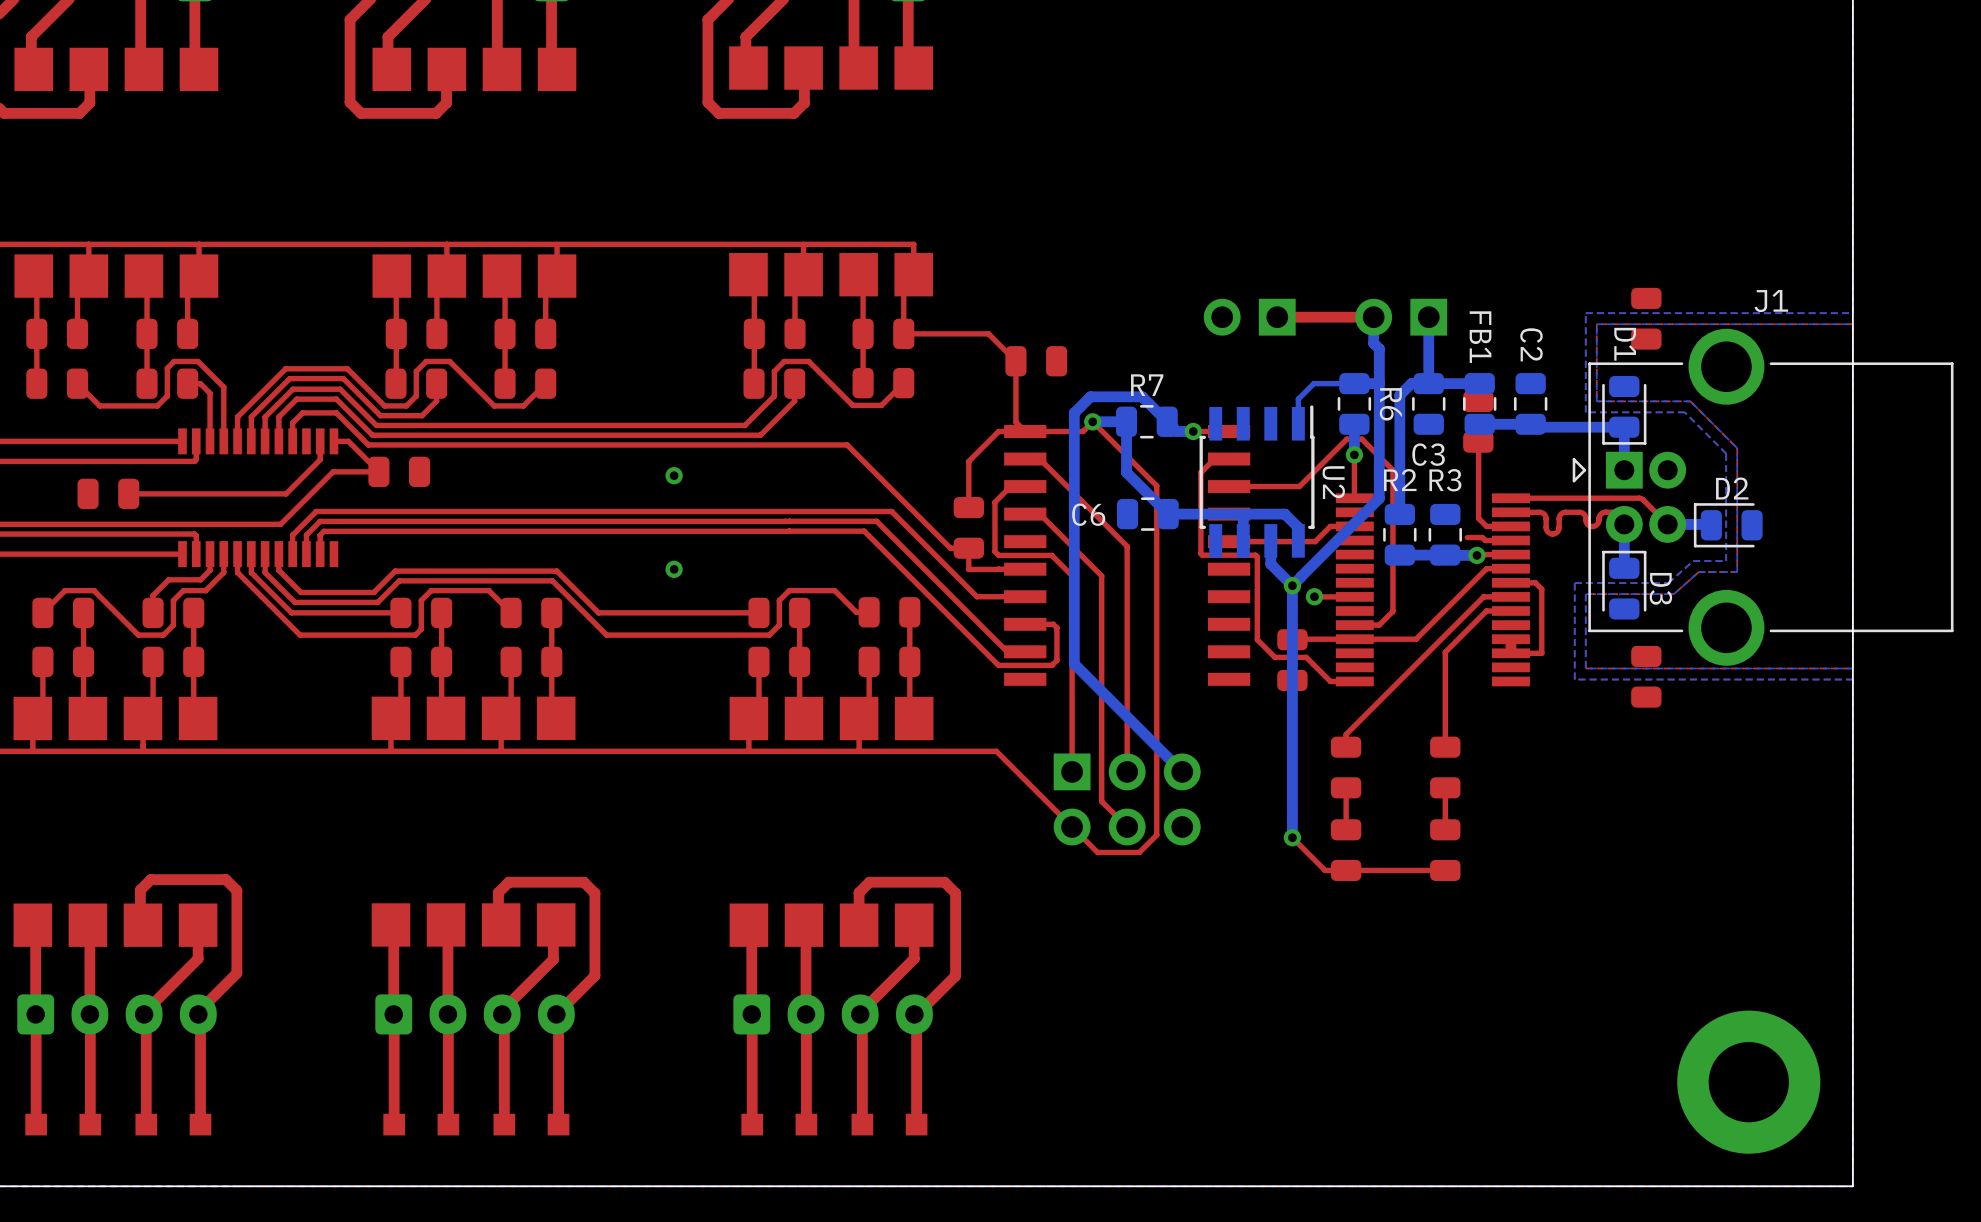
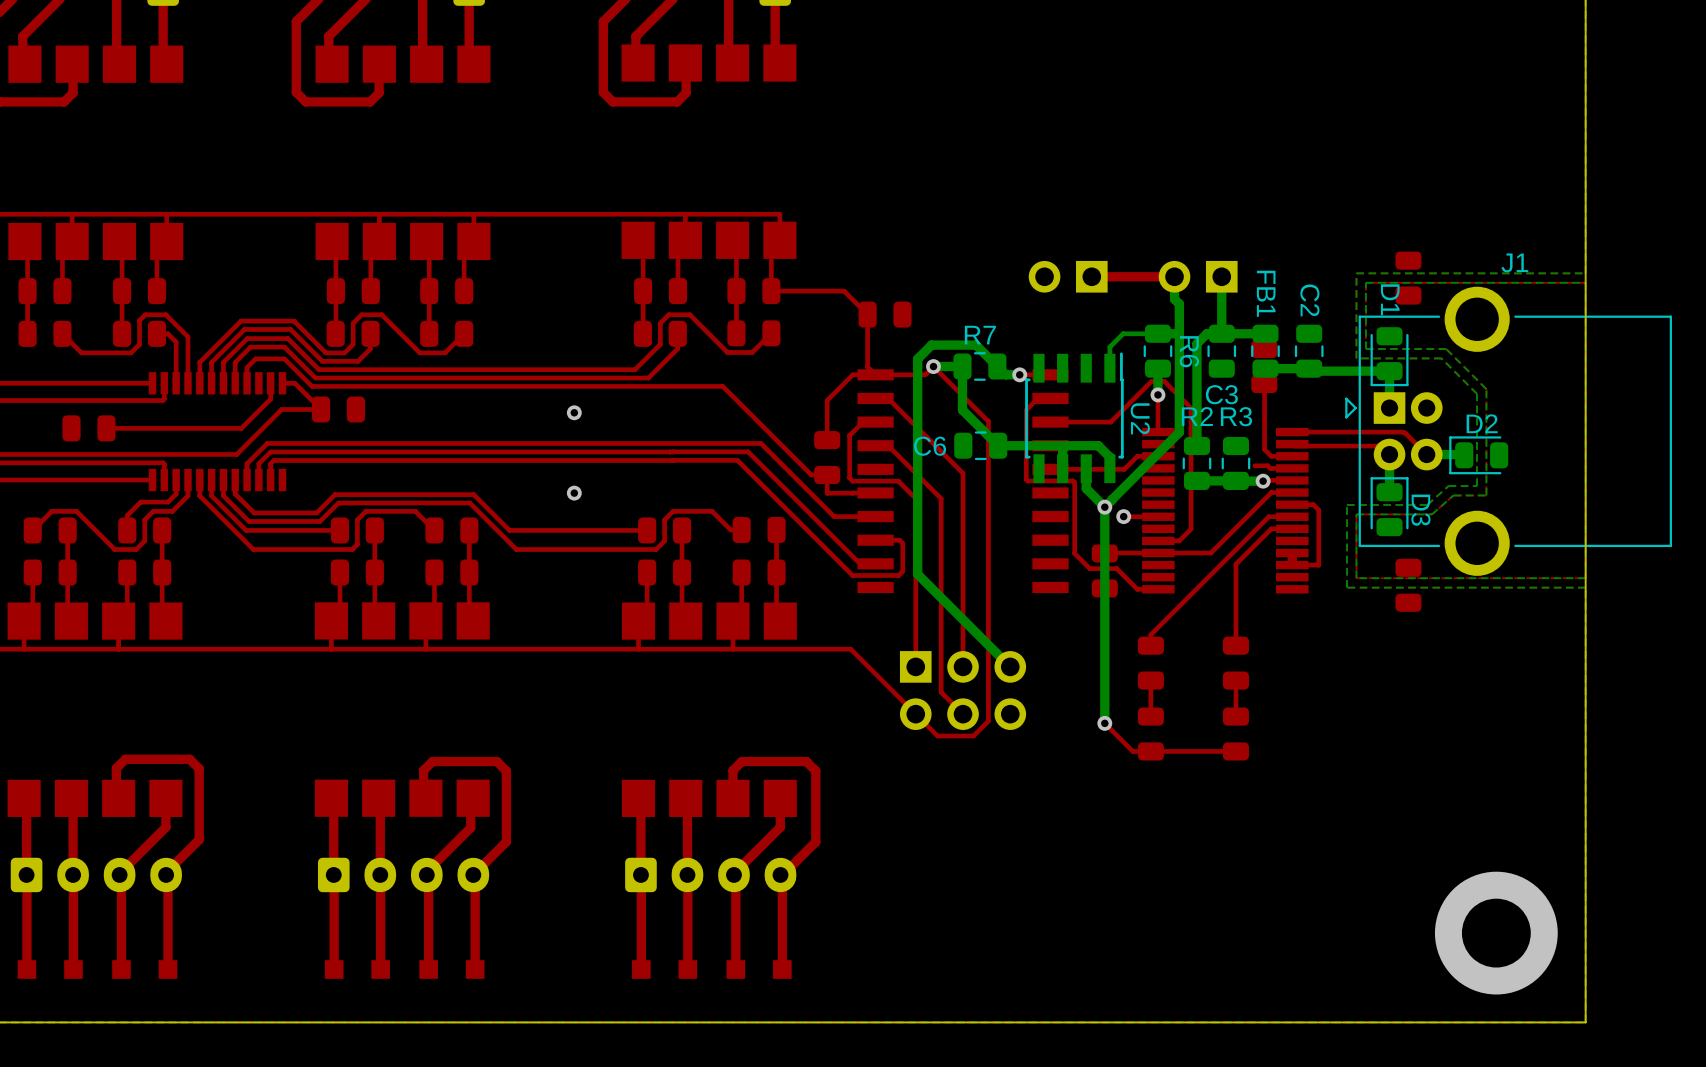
top track: (1510, 512) (1542, 513) (1545, 517) (1546, 529) (1551, 533) (1558, 530) (1559, 516) (1564, 512) (1582, 513) (1587, 523) (1592, 526) (1597, 523) (1601, 513) (1612, 512) (1624, 524) -> none
top track: none -> (1381, 446) (1294, 446)

